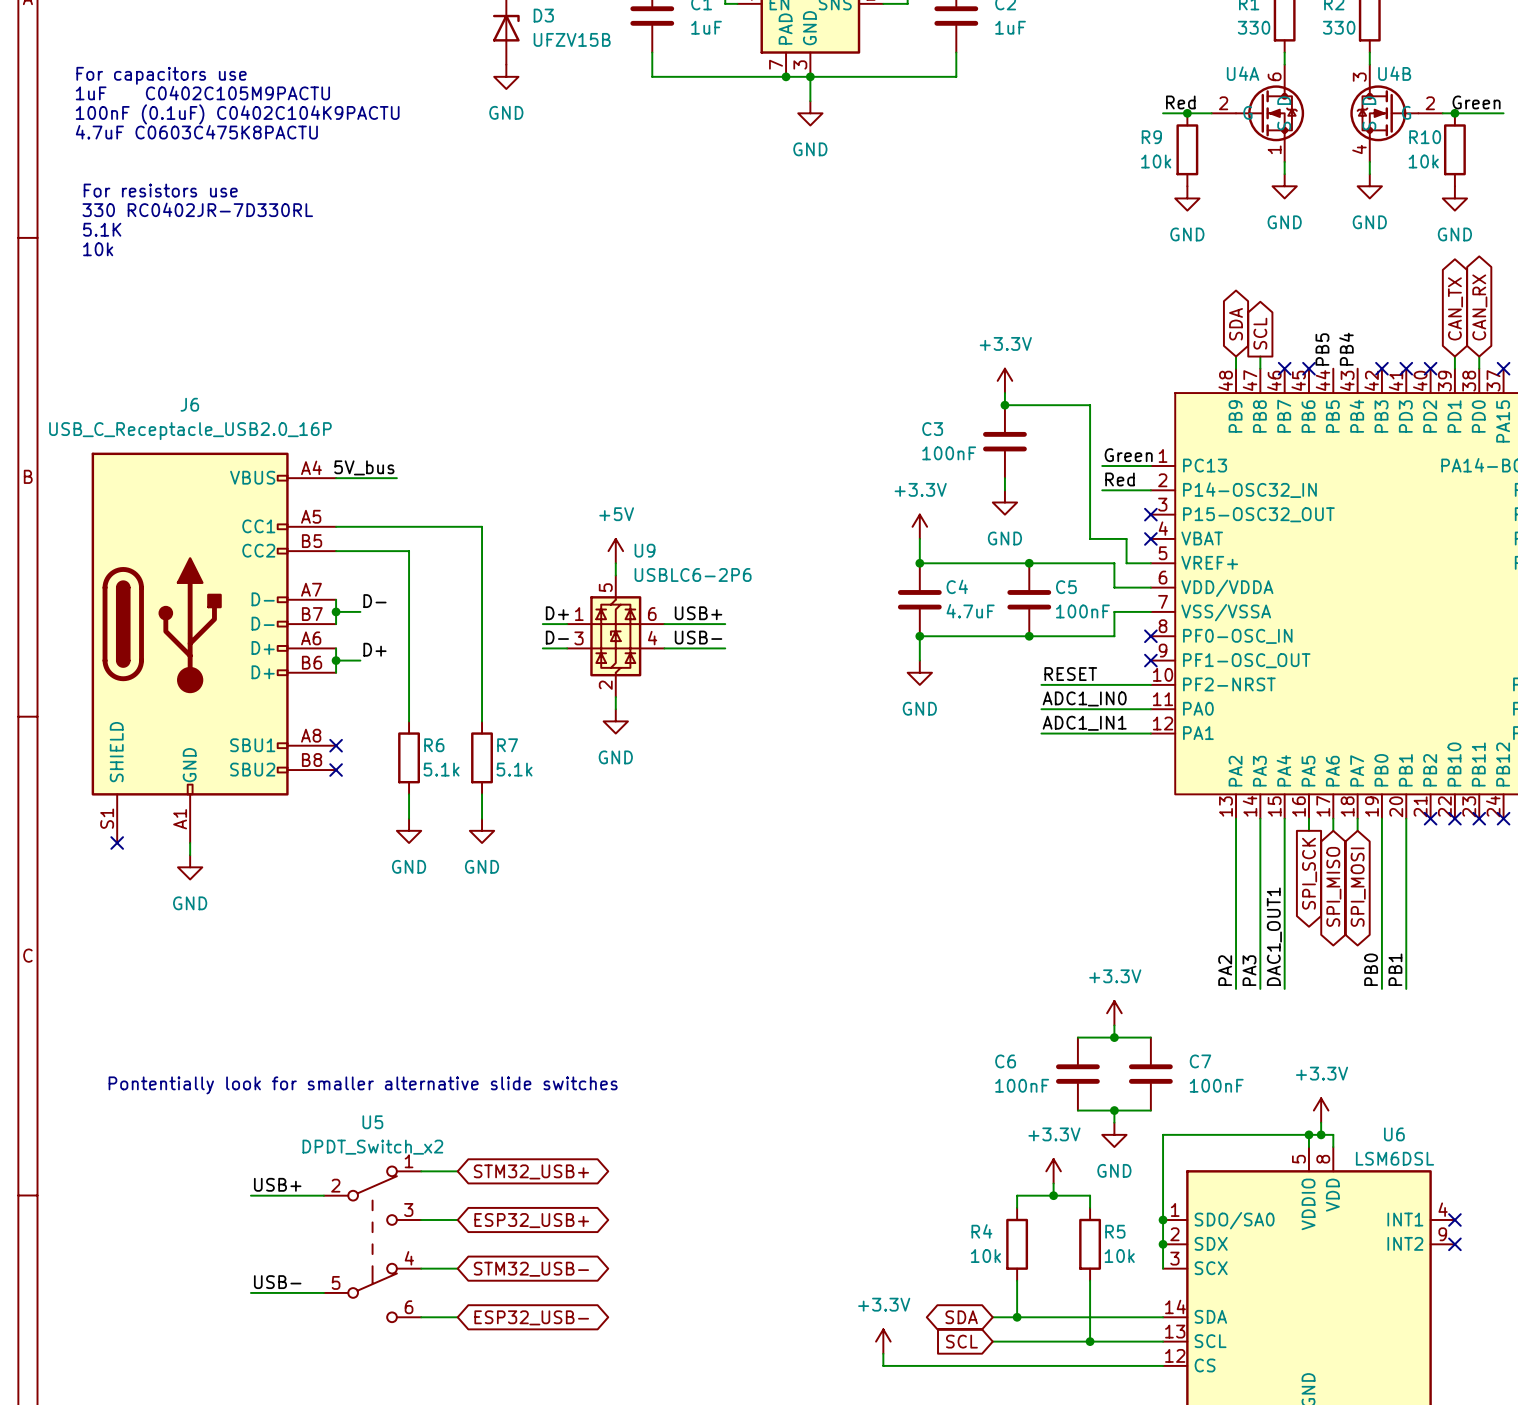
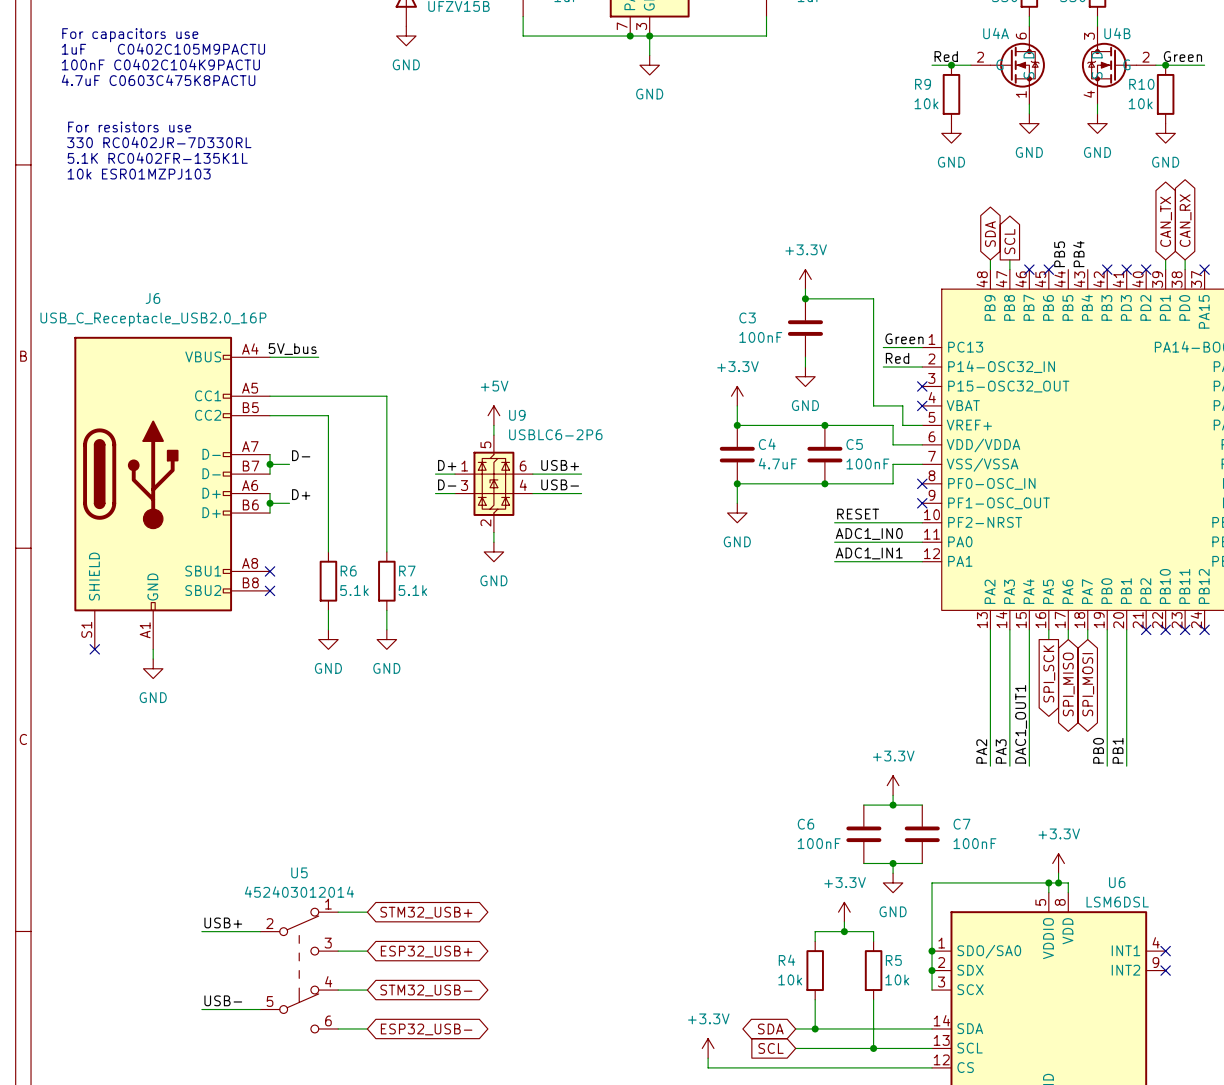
text: 100nF (0.1uF) C0402C104K9PACTU (237, 114) -> 100nF C0402C104K9PACTU (160, 64)
text: 5.1K (102, 229) -> 5.1K RC0402FR-135K1L (157, 158)
text: 10k (98, 249) -> 10k ESR01MZPJ103 (139, 174)
text: Pontentially look for smaller alternative slide switches (363, 1085) -> none
U5 value: DPDT_Switch_x2 (372, 1147) -> 452403012014 (299, 892)

